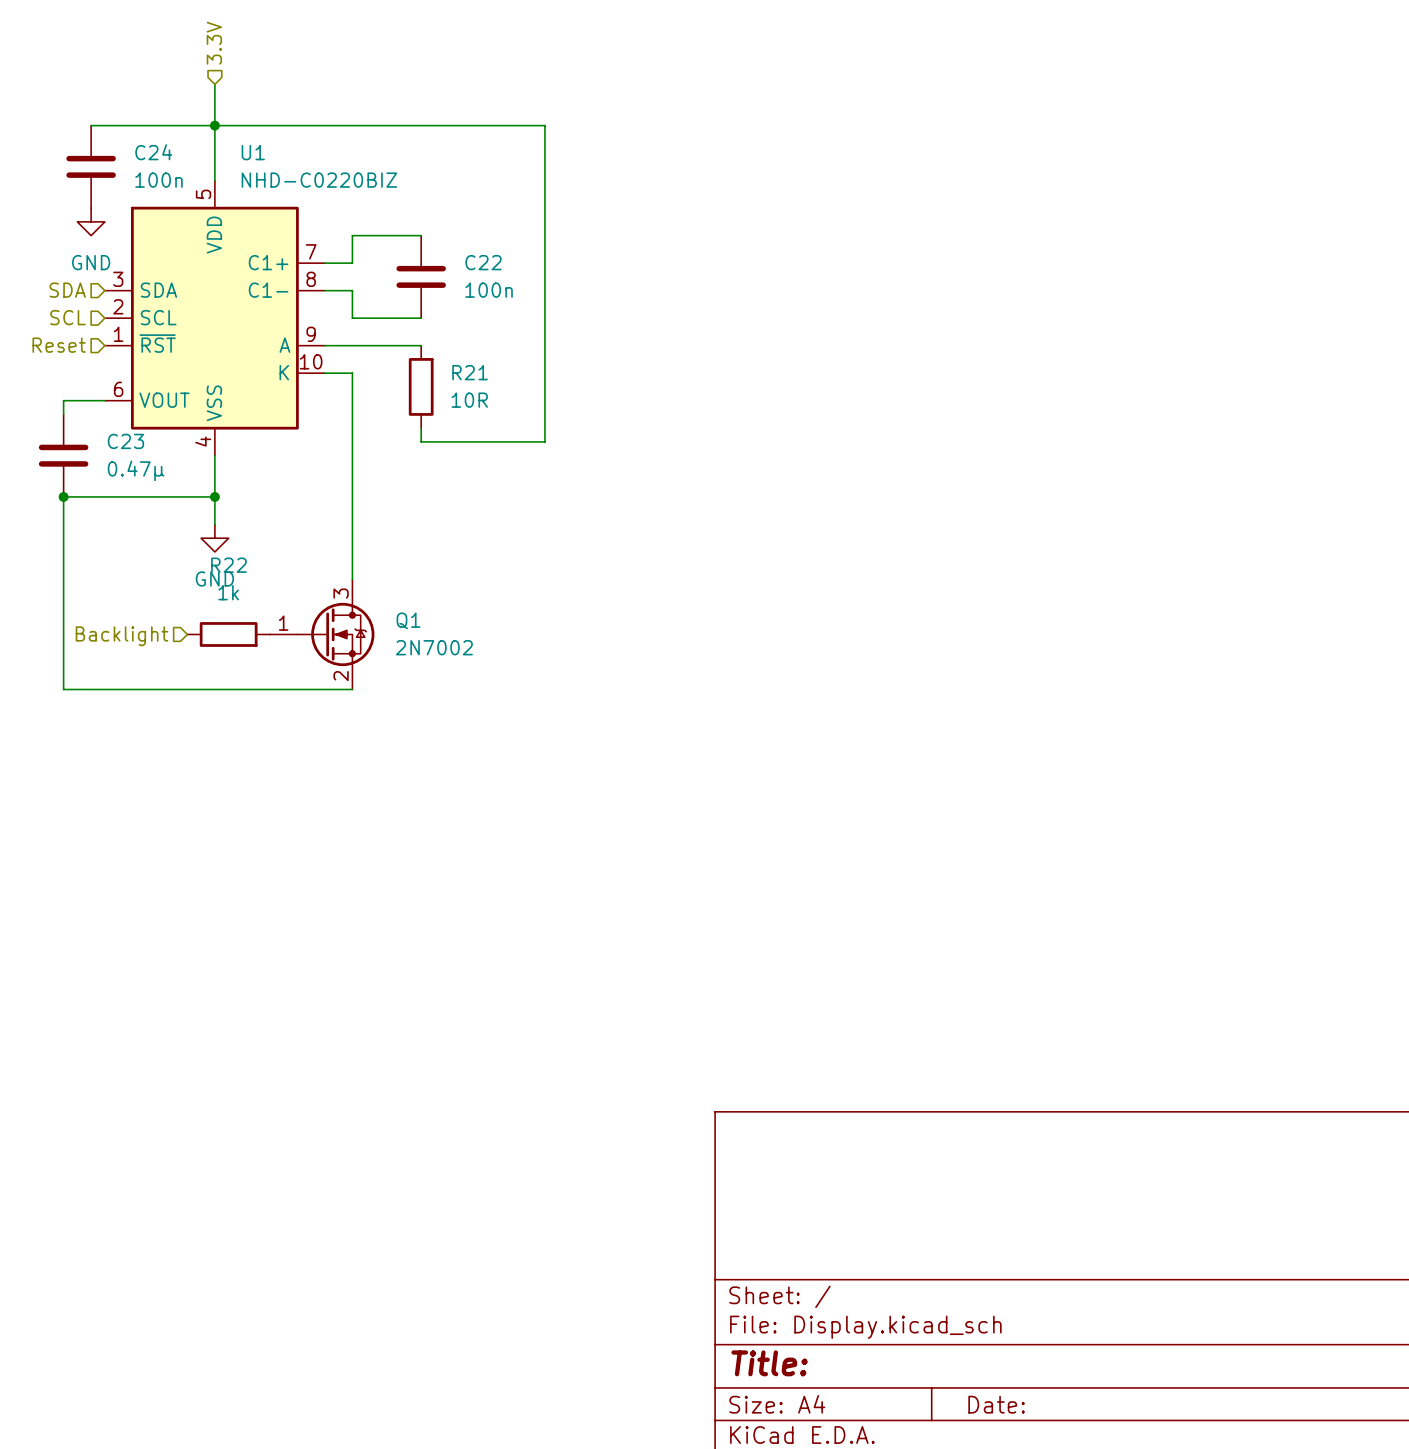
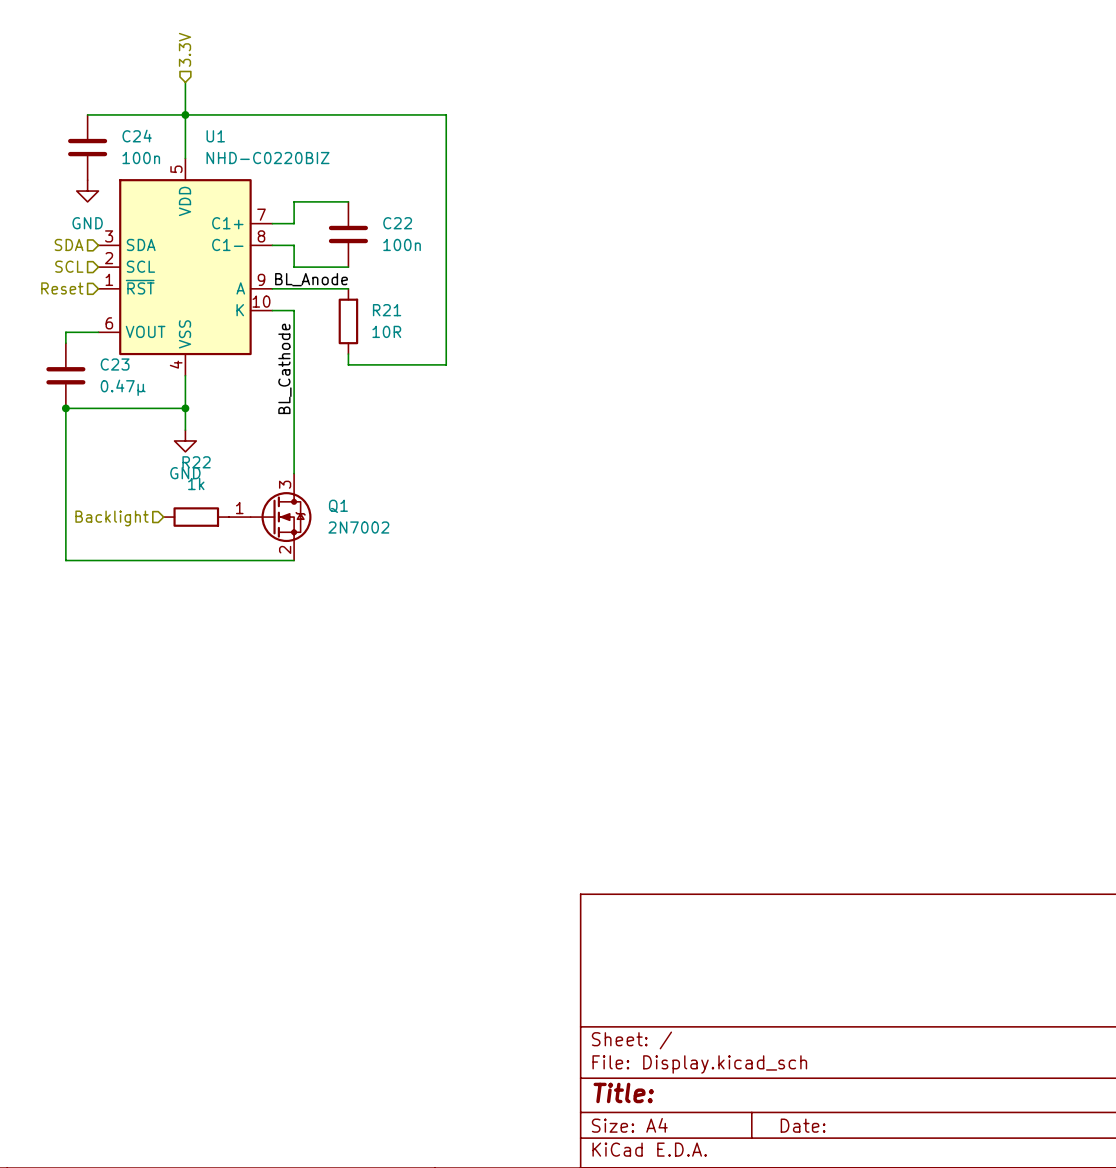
label: none -> BL_Anode (311, 279)
label: none -> BL_Cathode (284, 368)

